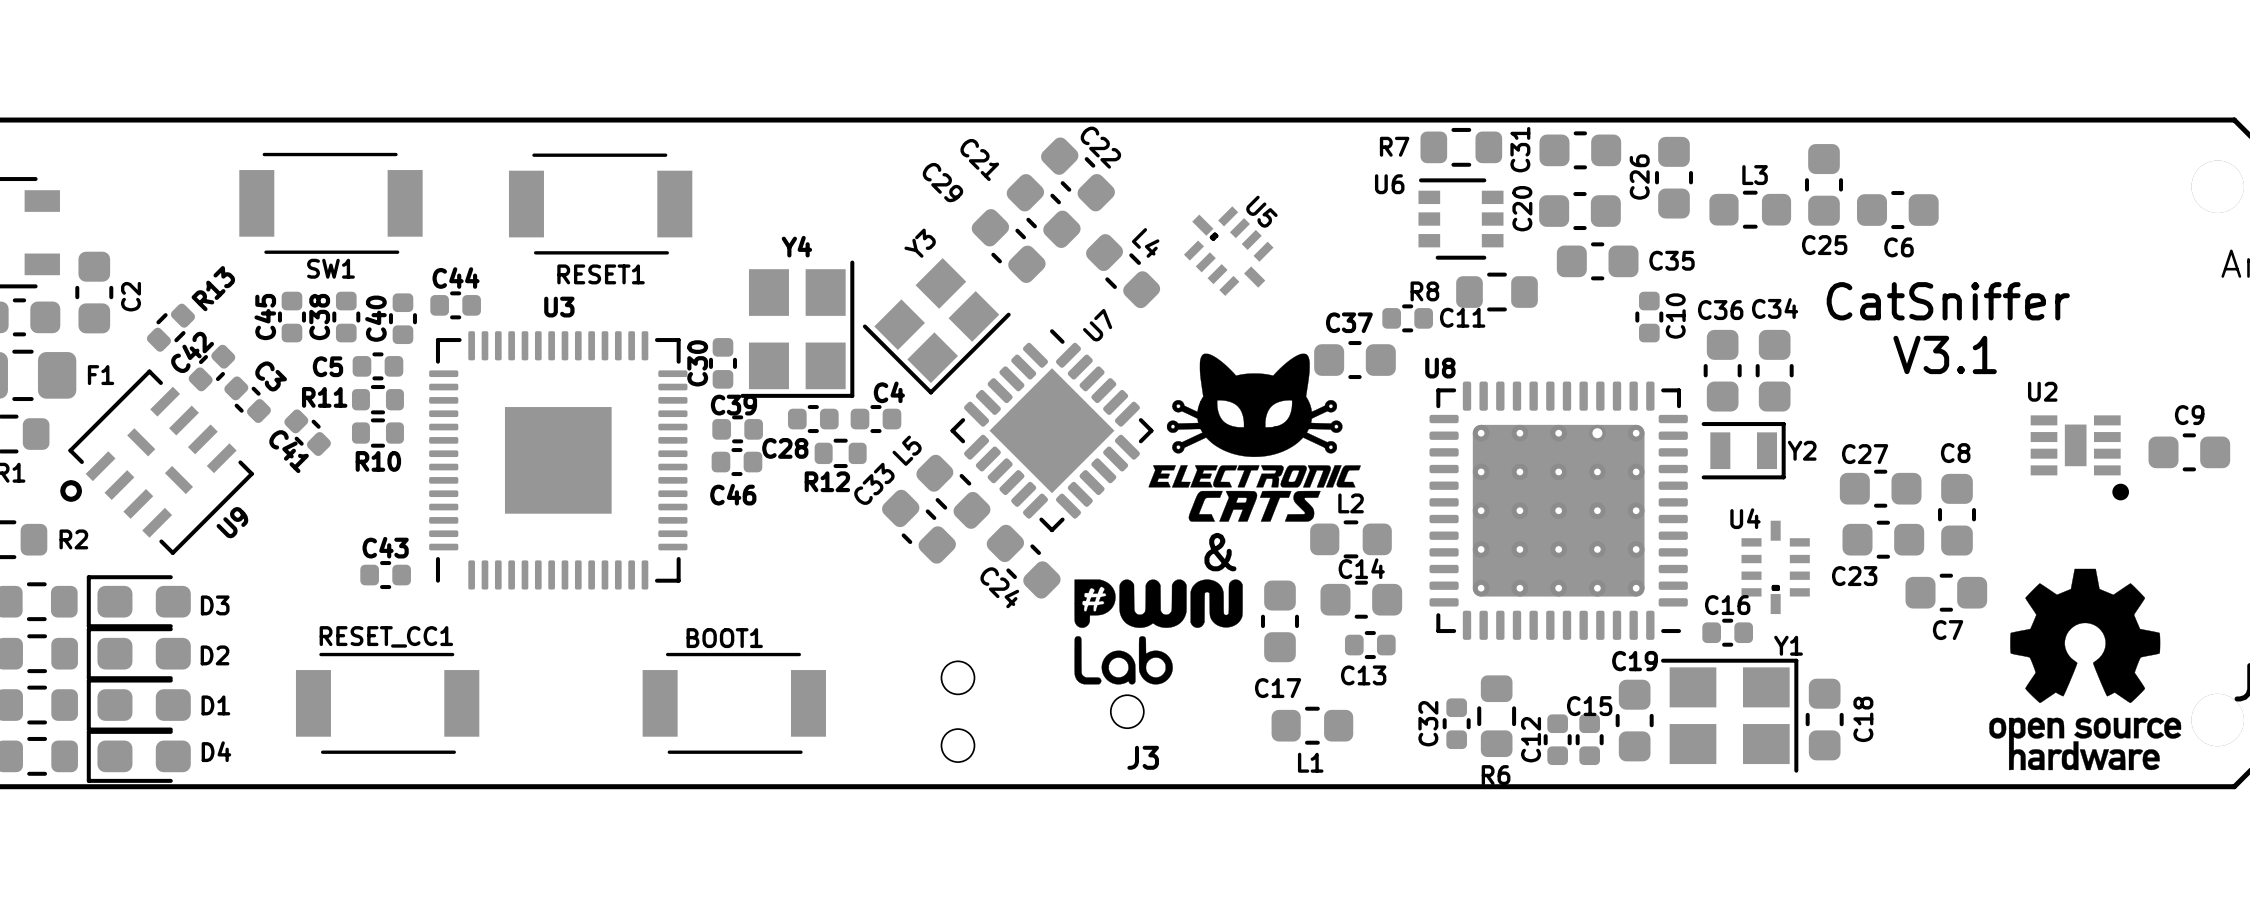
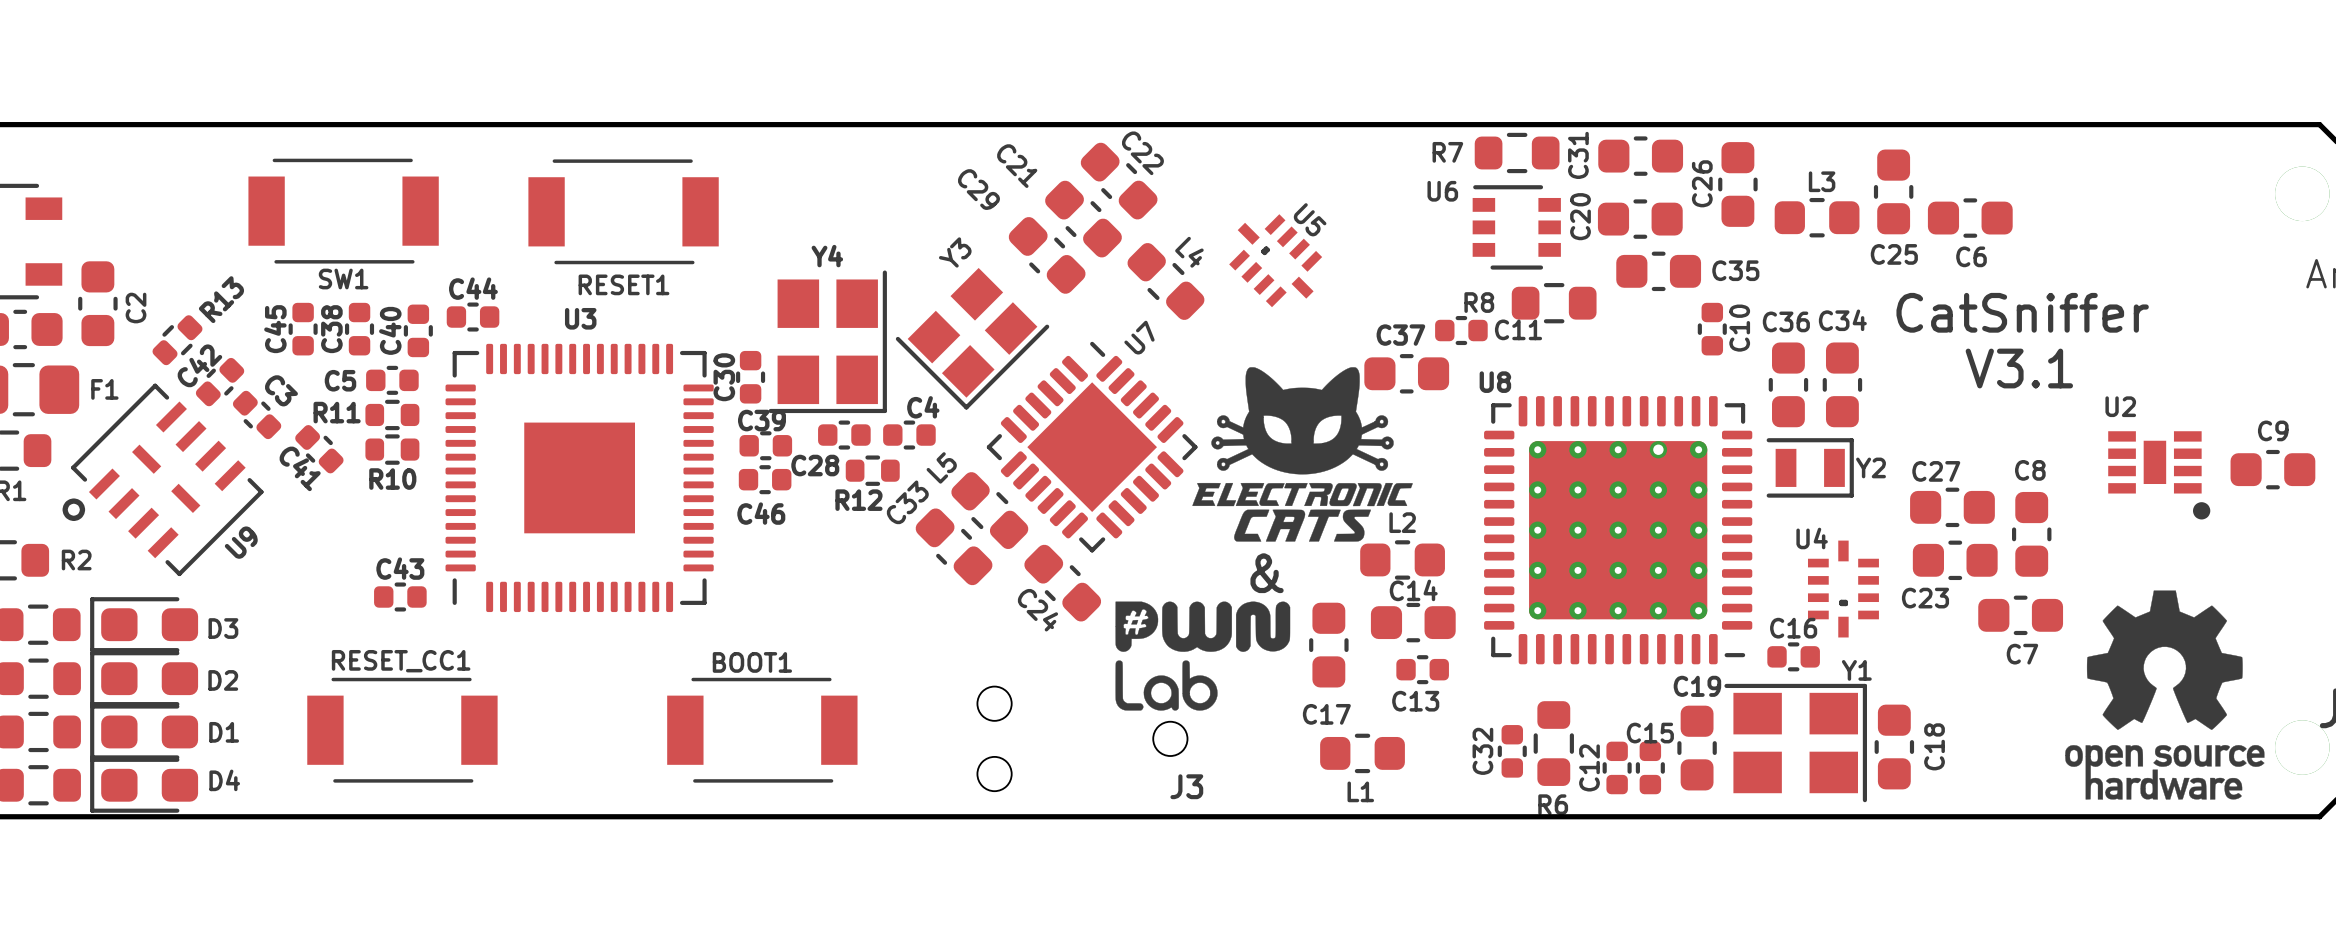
U5 footprint: [1183, 206, 1274, 296] -> [1229, 214, 1323, 308]
U4 footprint: [1741, 520, 1810, 615] -> [1807, 540, 1879, 638]

